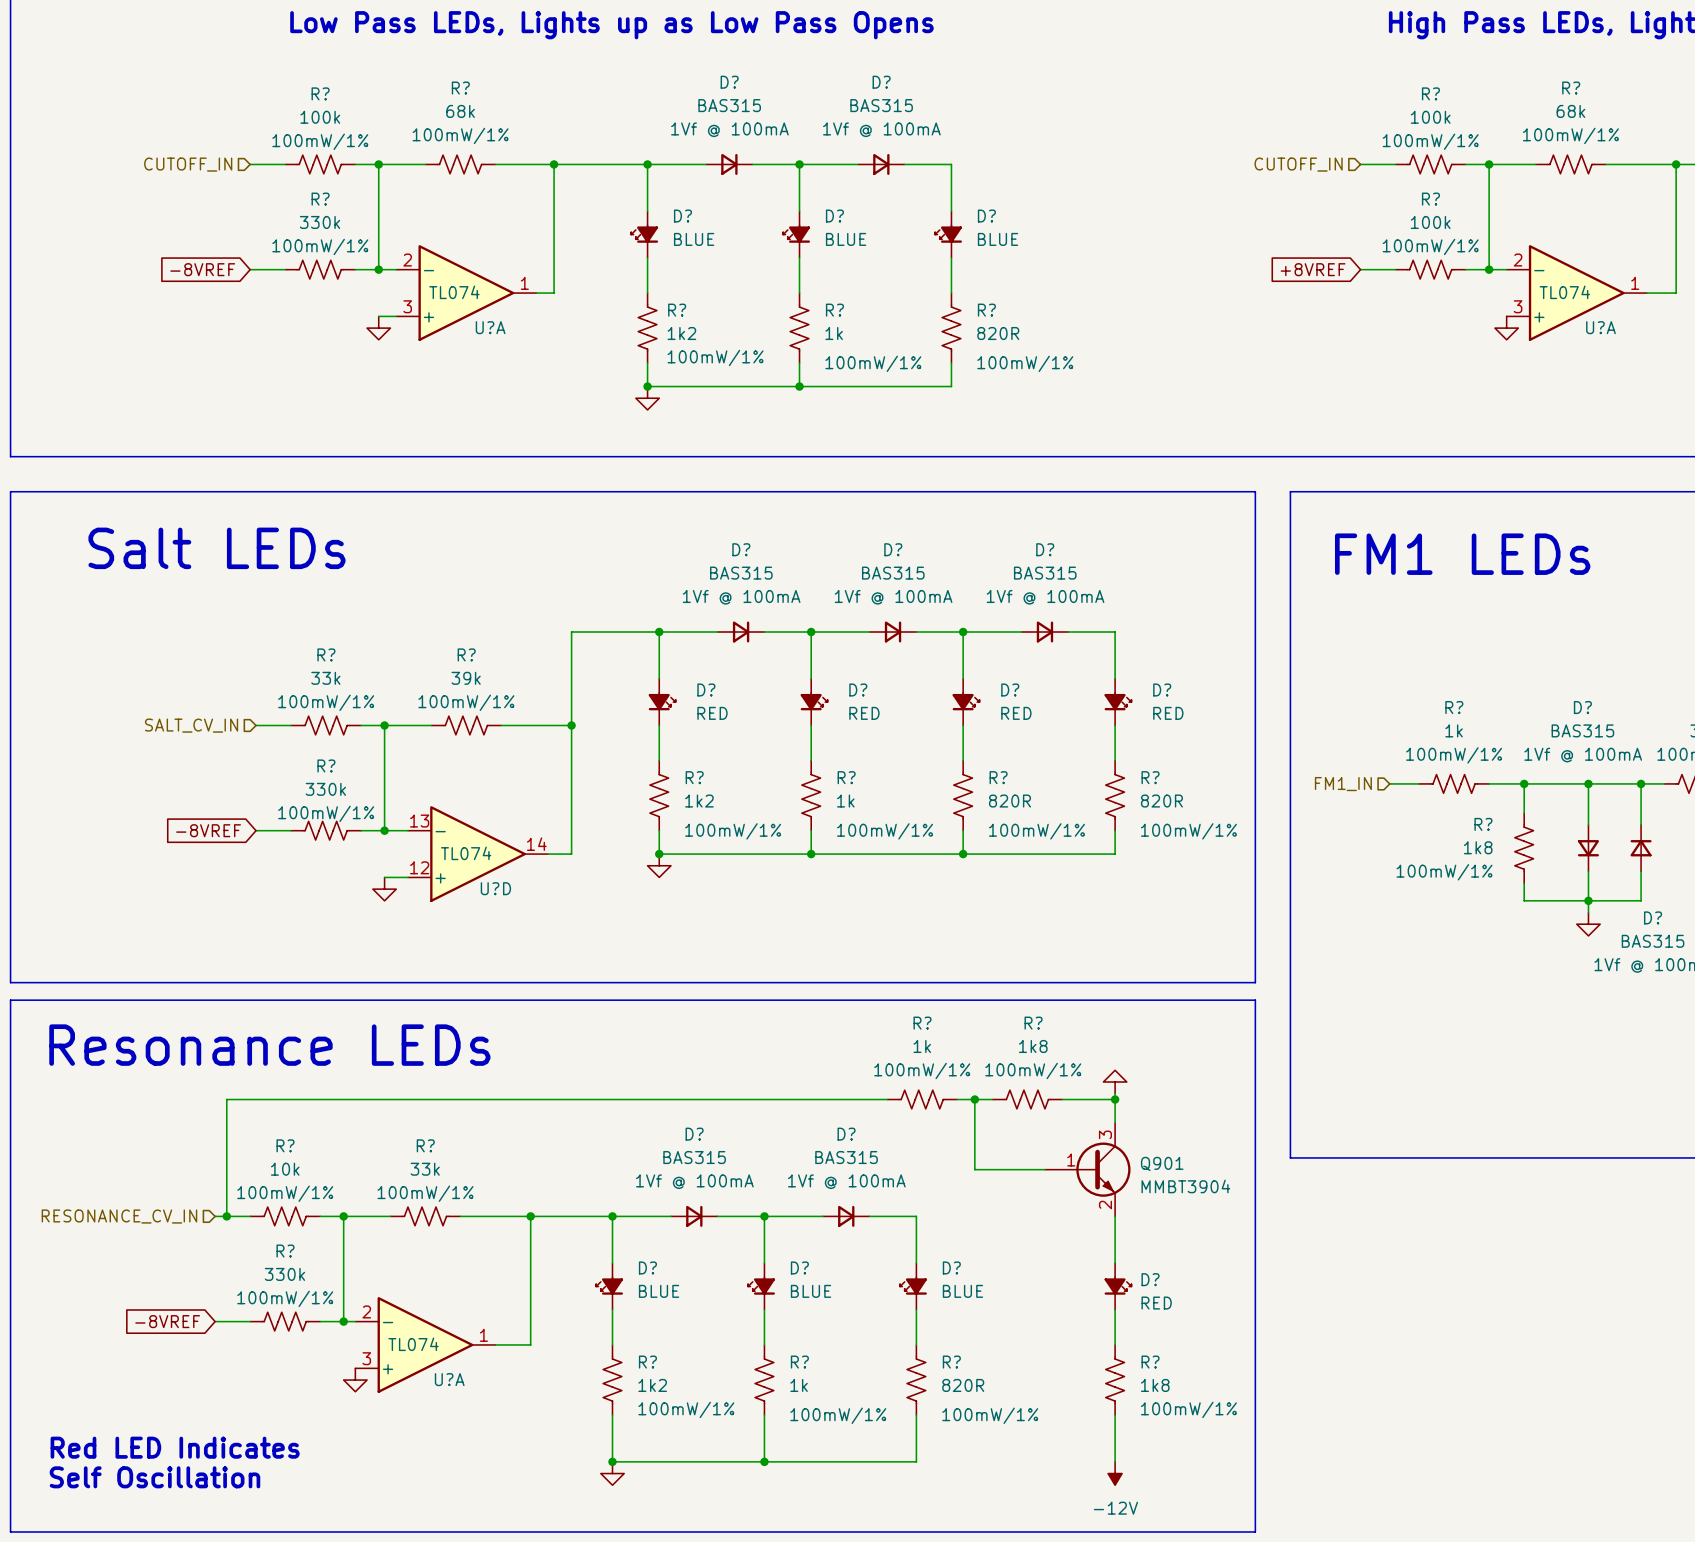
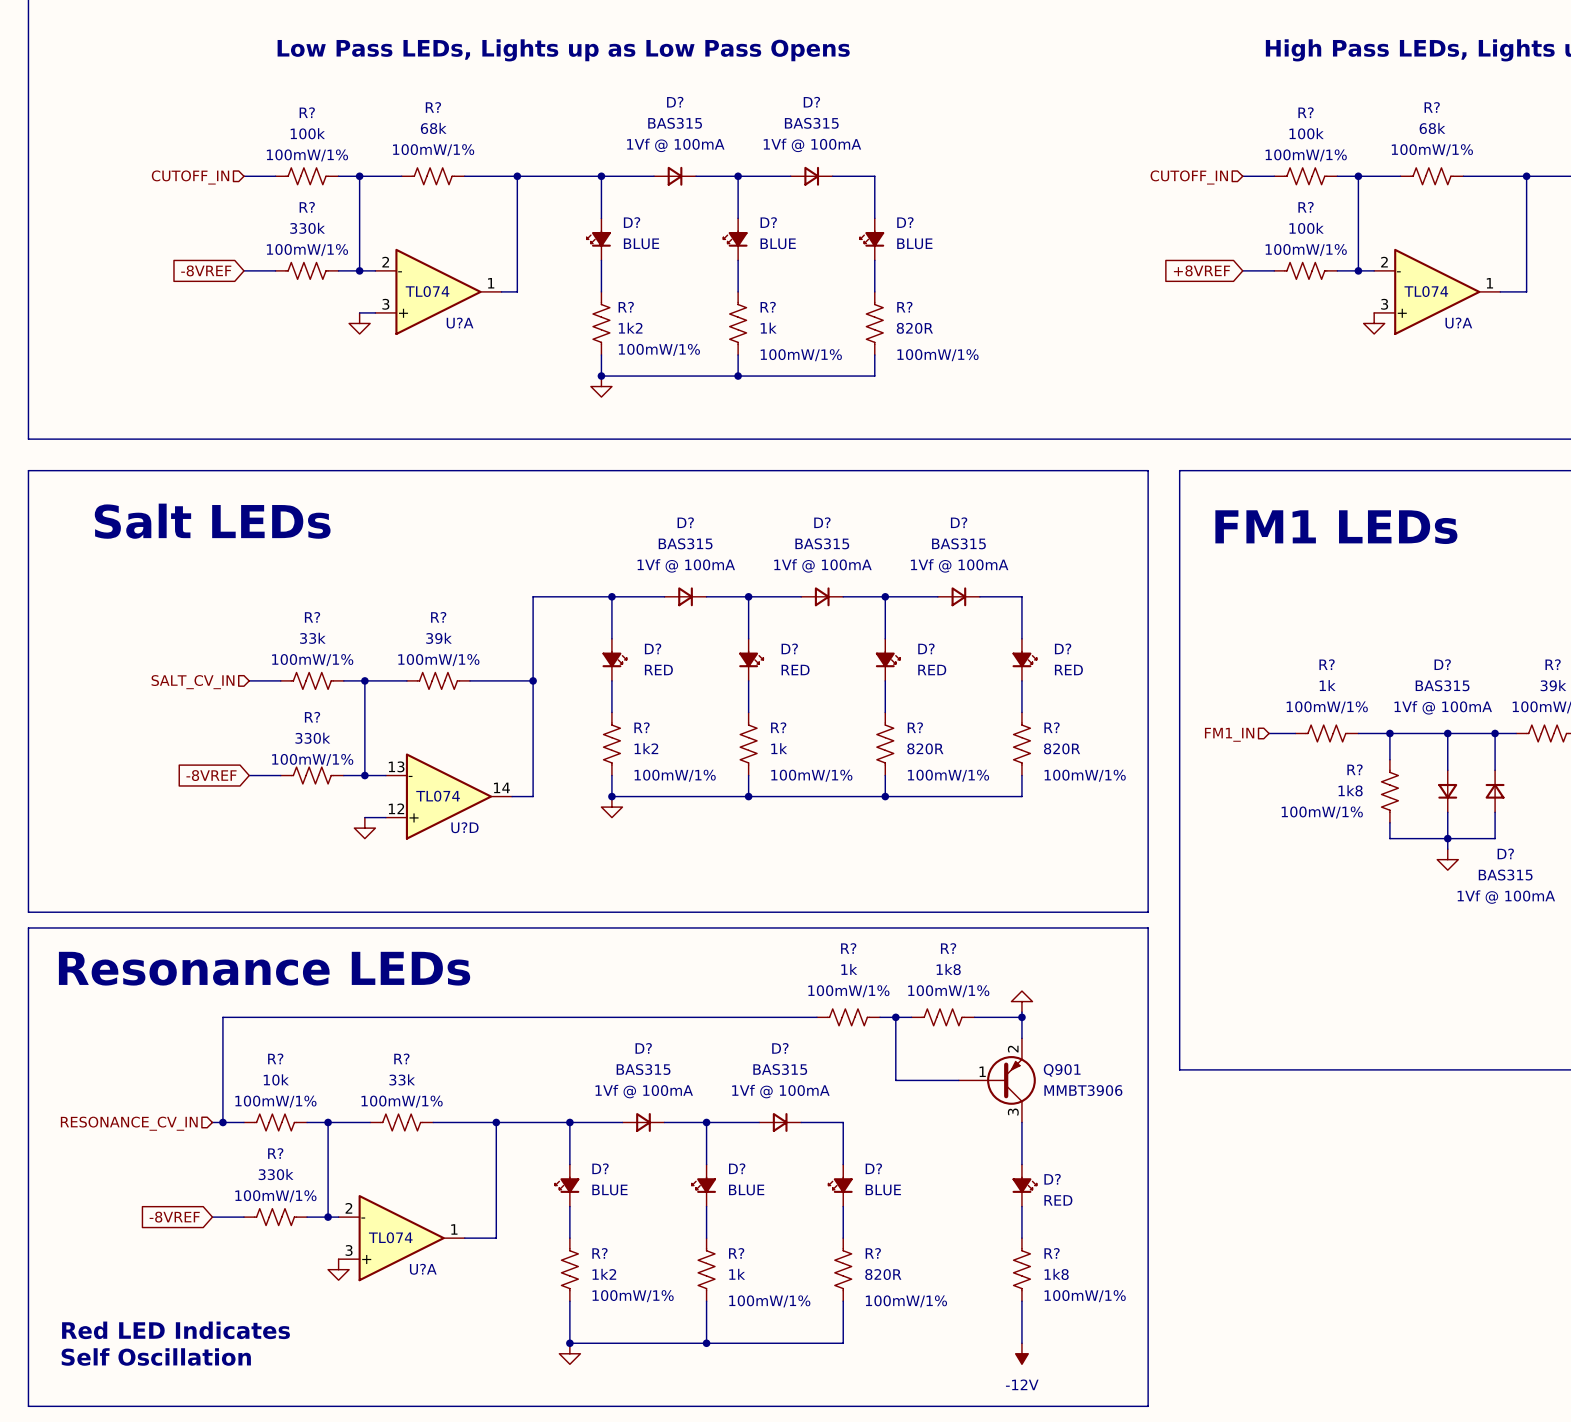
Q901 symbol: [1044, 1122, 1131, 1217] -> [958, 1038, 1036, 1123]
Q901 value: MMBT3904 (1185, 1186) -> MMBT3906 (1083, 1090)

